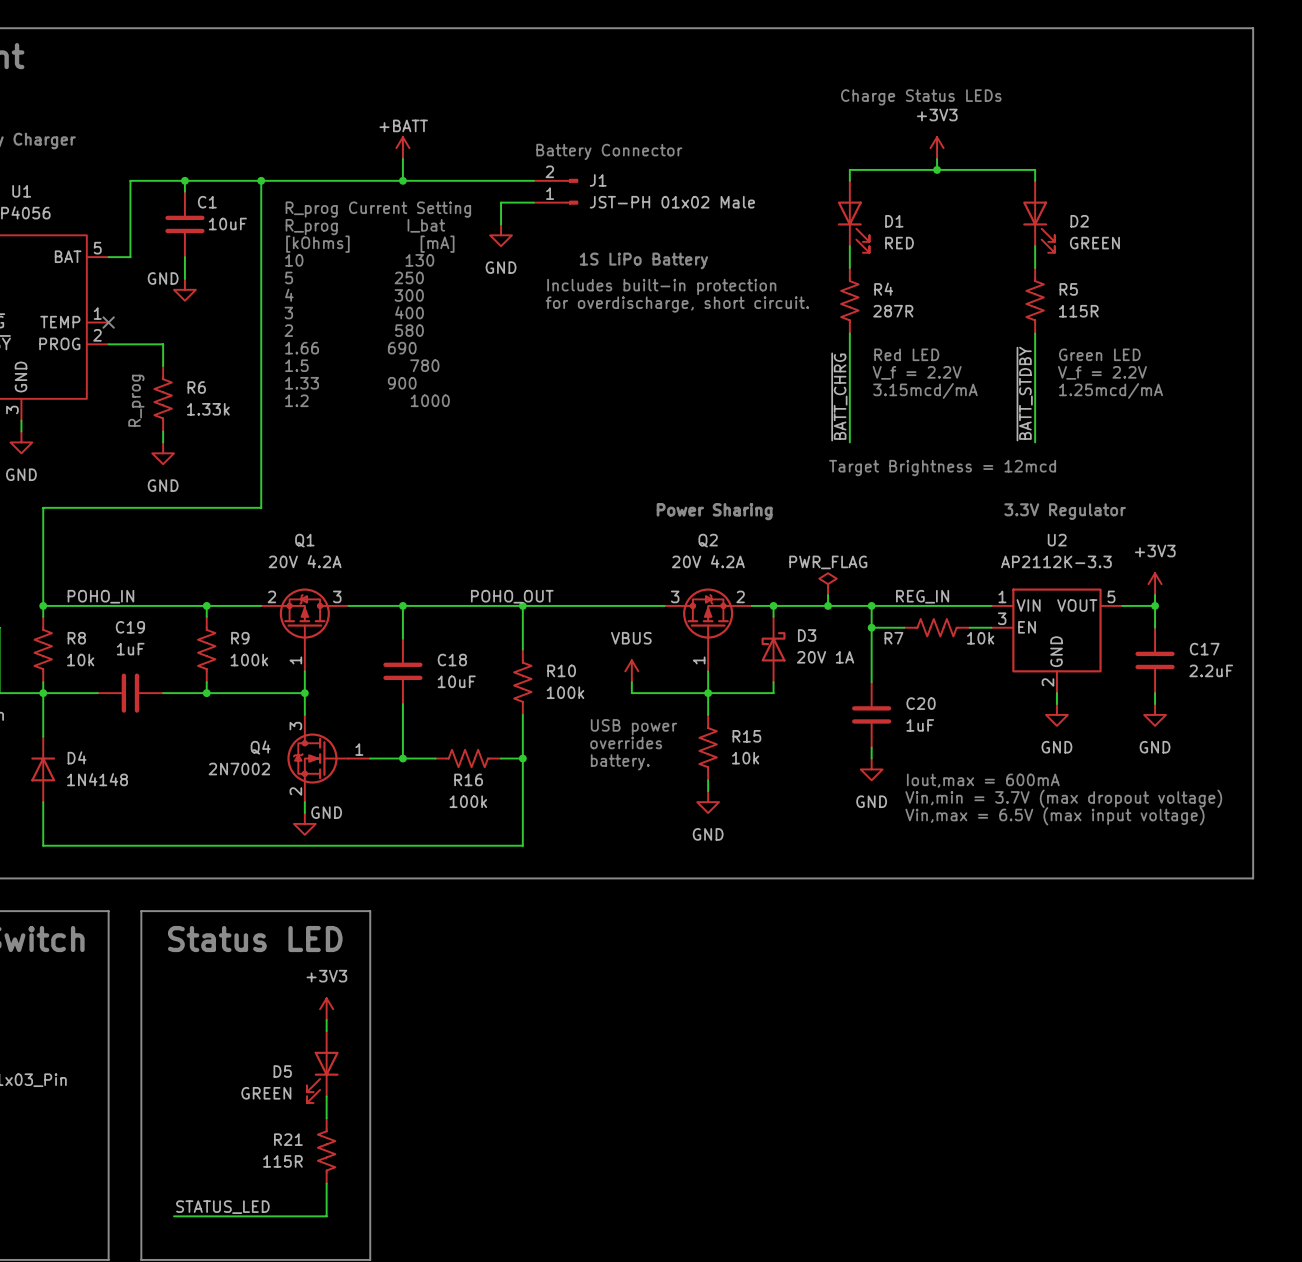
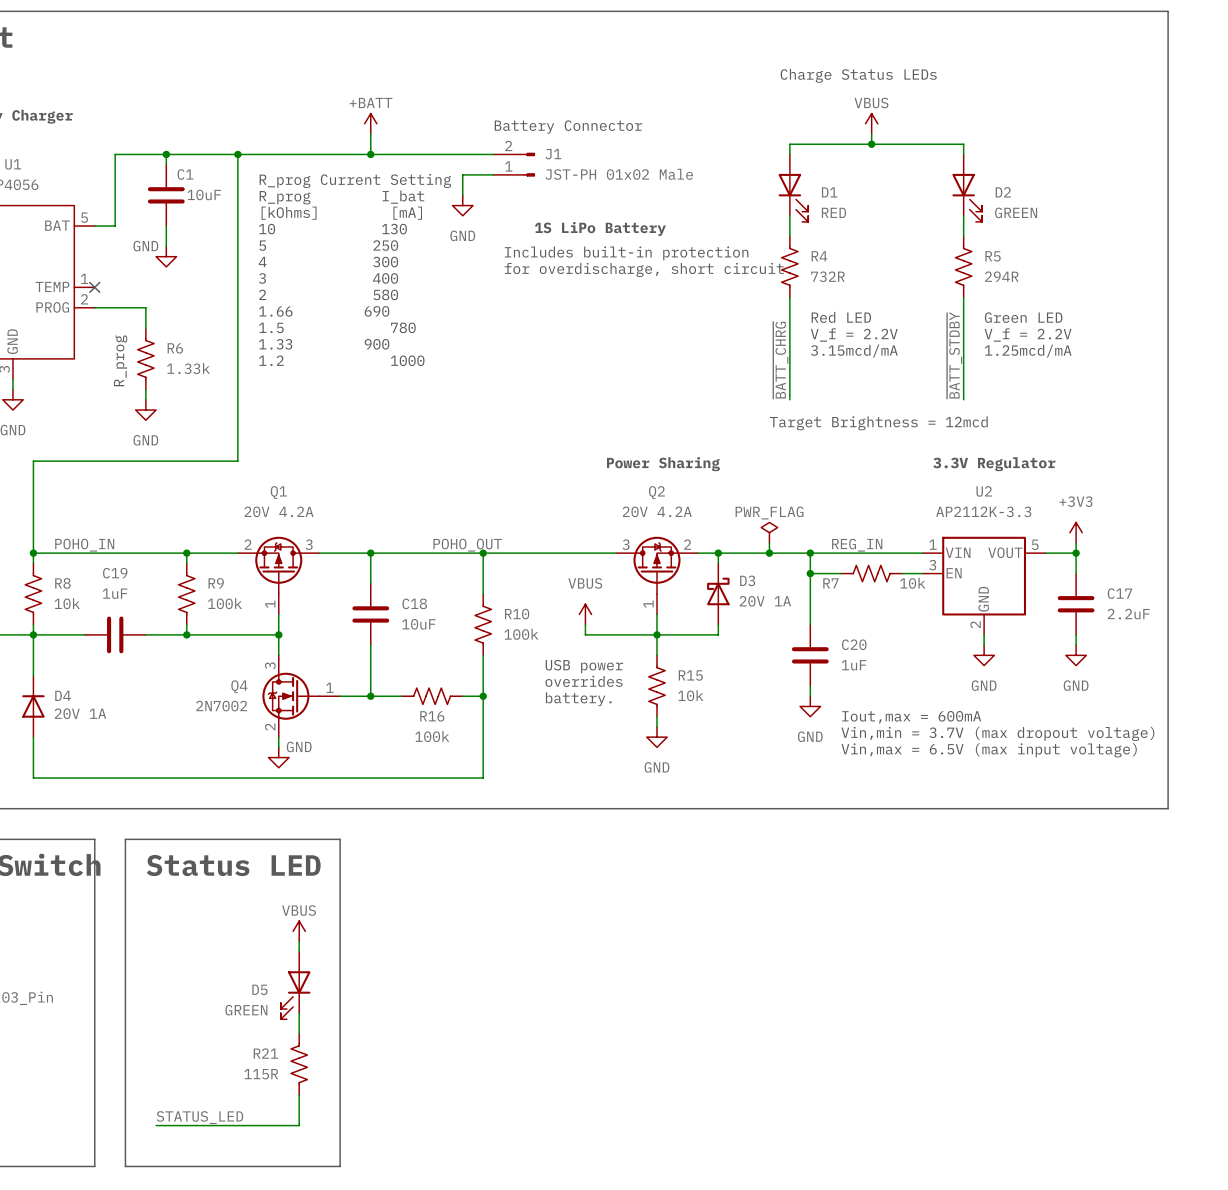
power symbol: +3V3 (937, 148) -> VBUS (871, 123)
R4 value: 287R (893, 311) -> 732R (828, 276)
R5 value: 115R (1078, 311) -> 294R (1001, 276)
D4 value: 1N4148 (97, 779) -> 20V 1A (80, 713)
power symbol: +3V3 (326, 1009) -> VBUS (299, 931)

